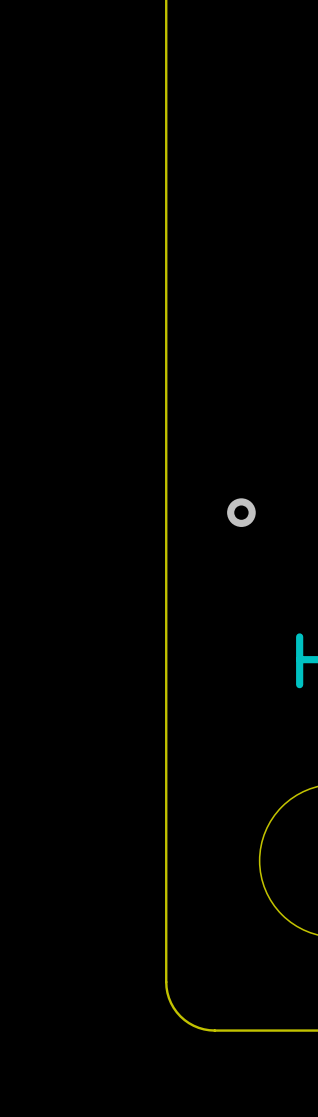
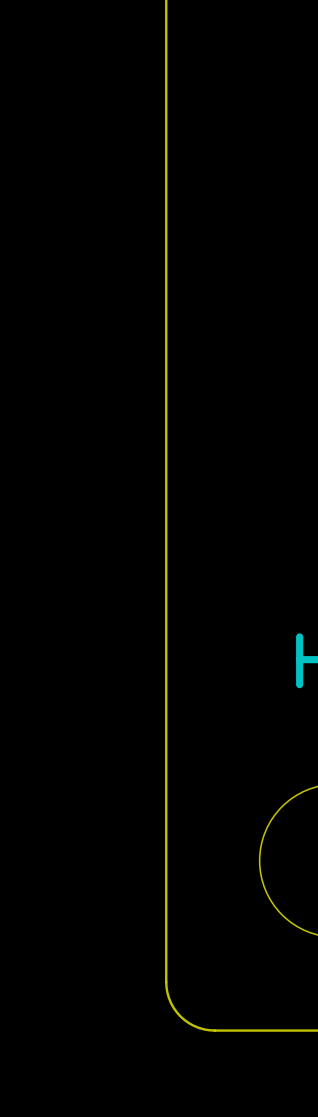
via: (241, 512) -> none

